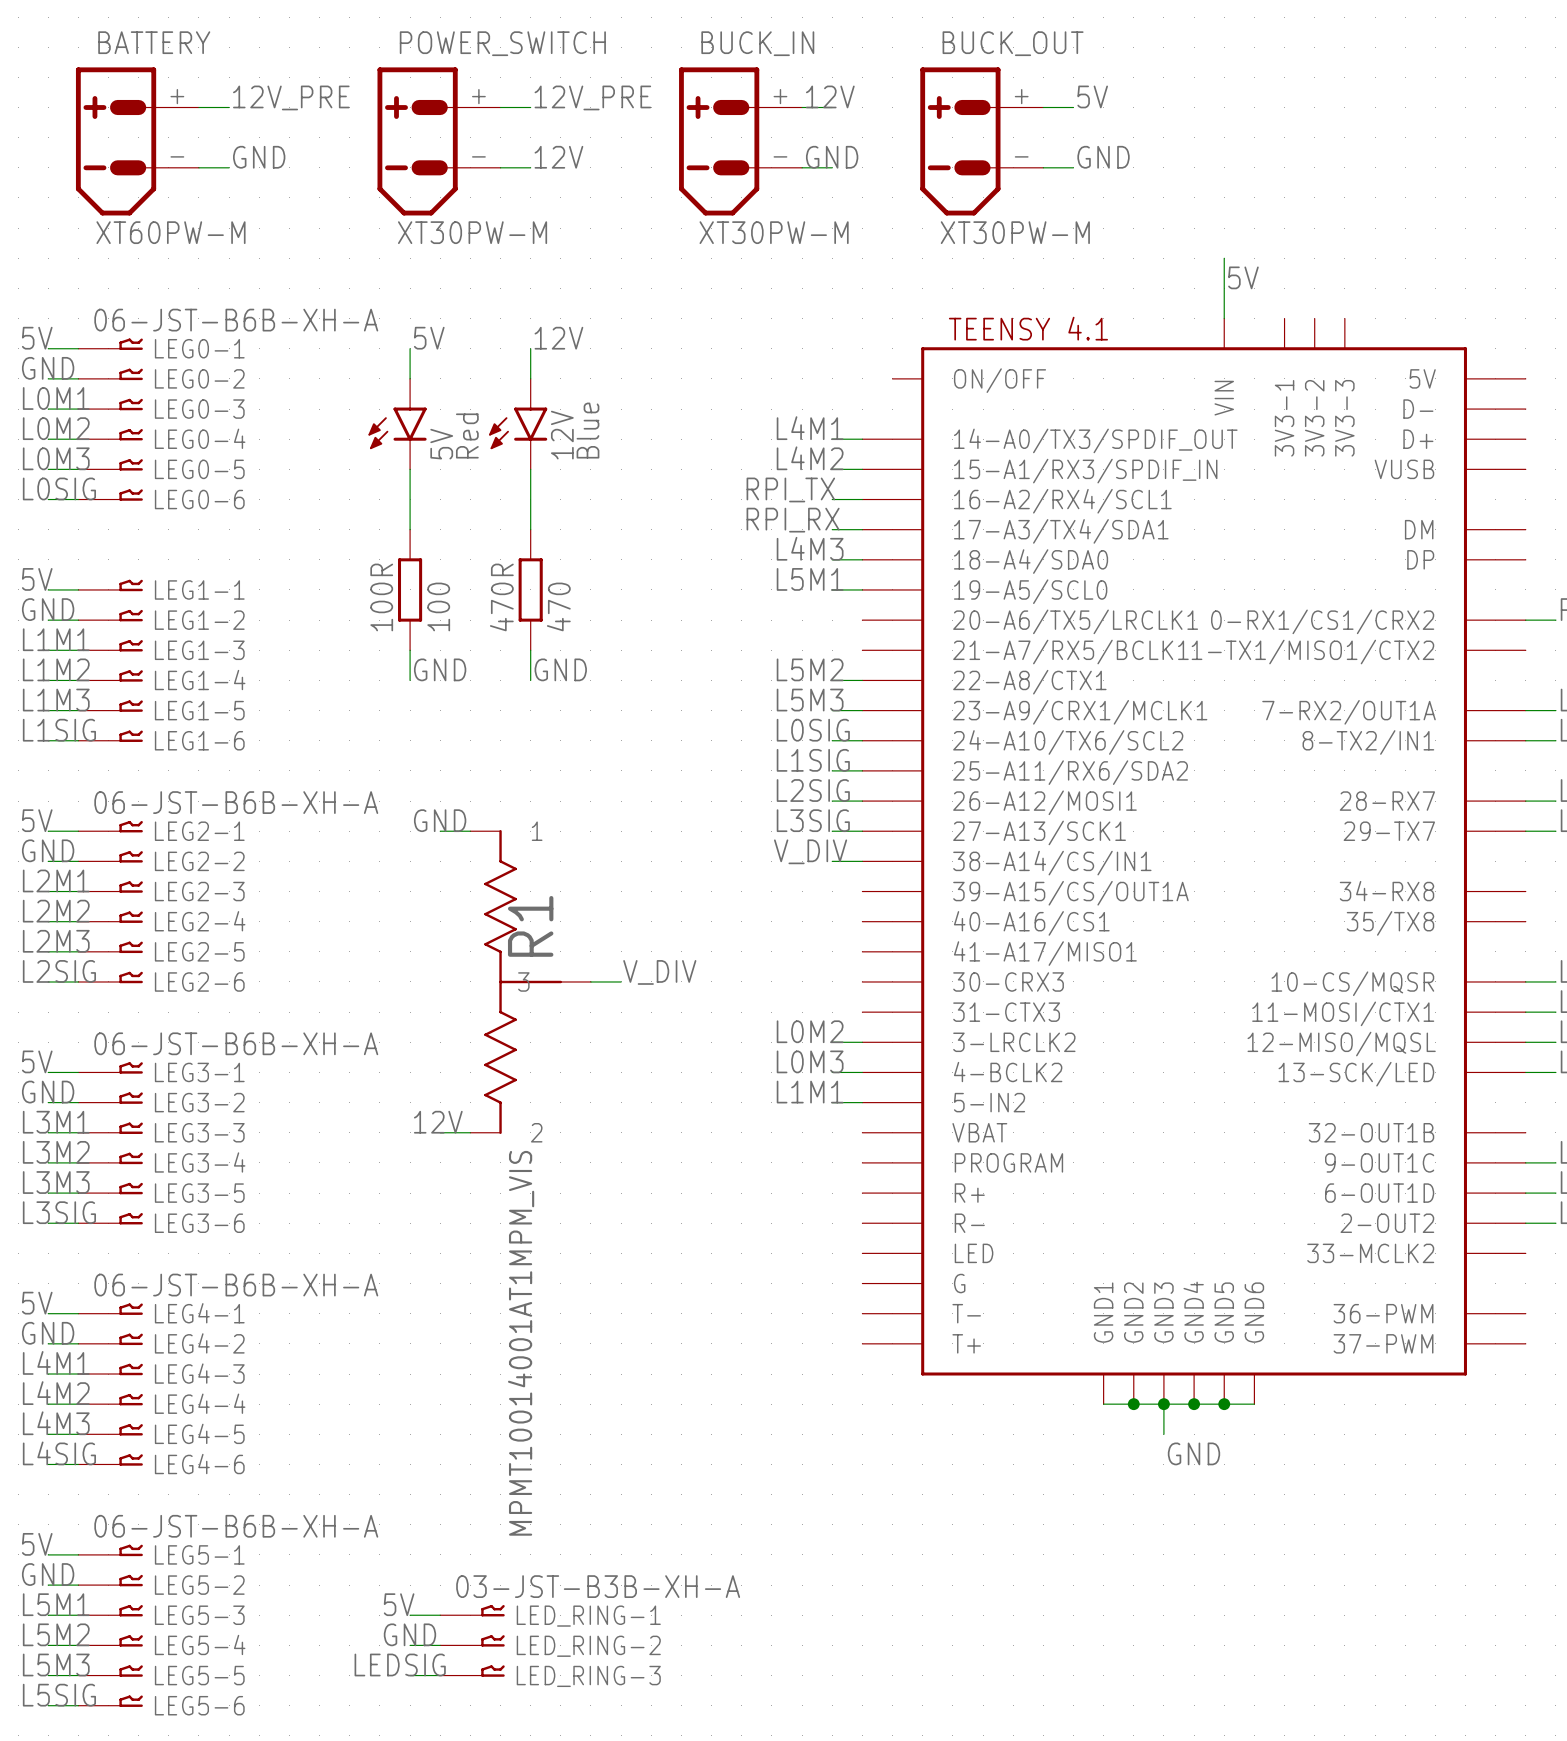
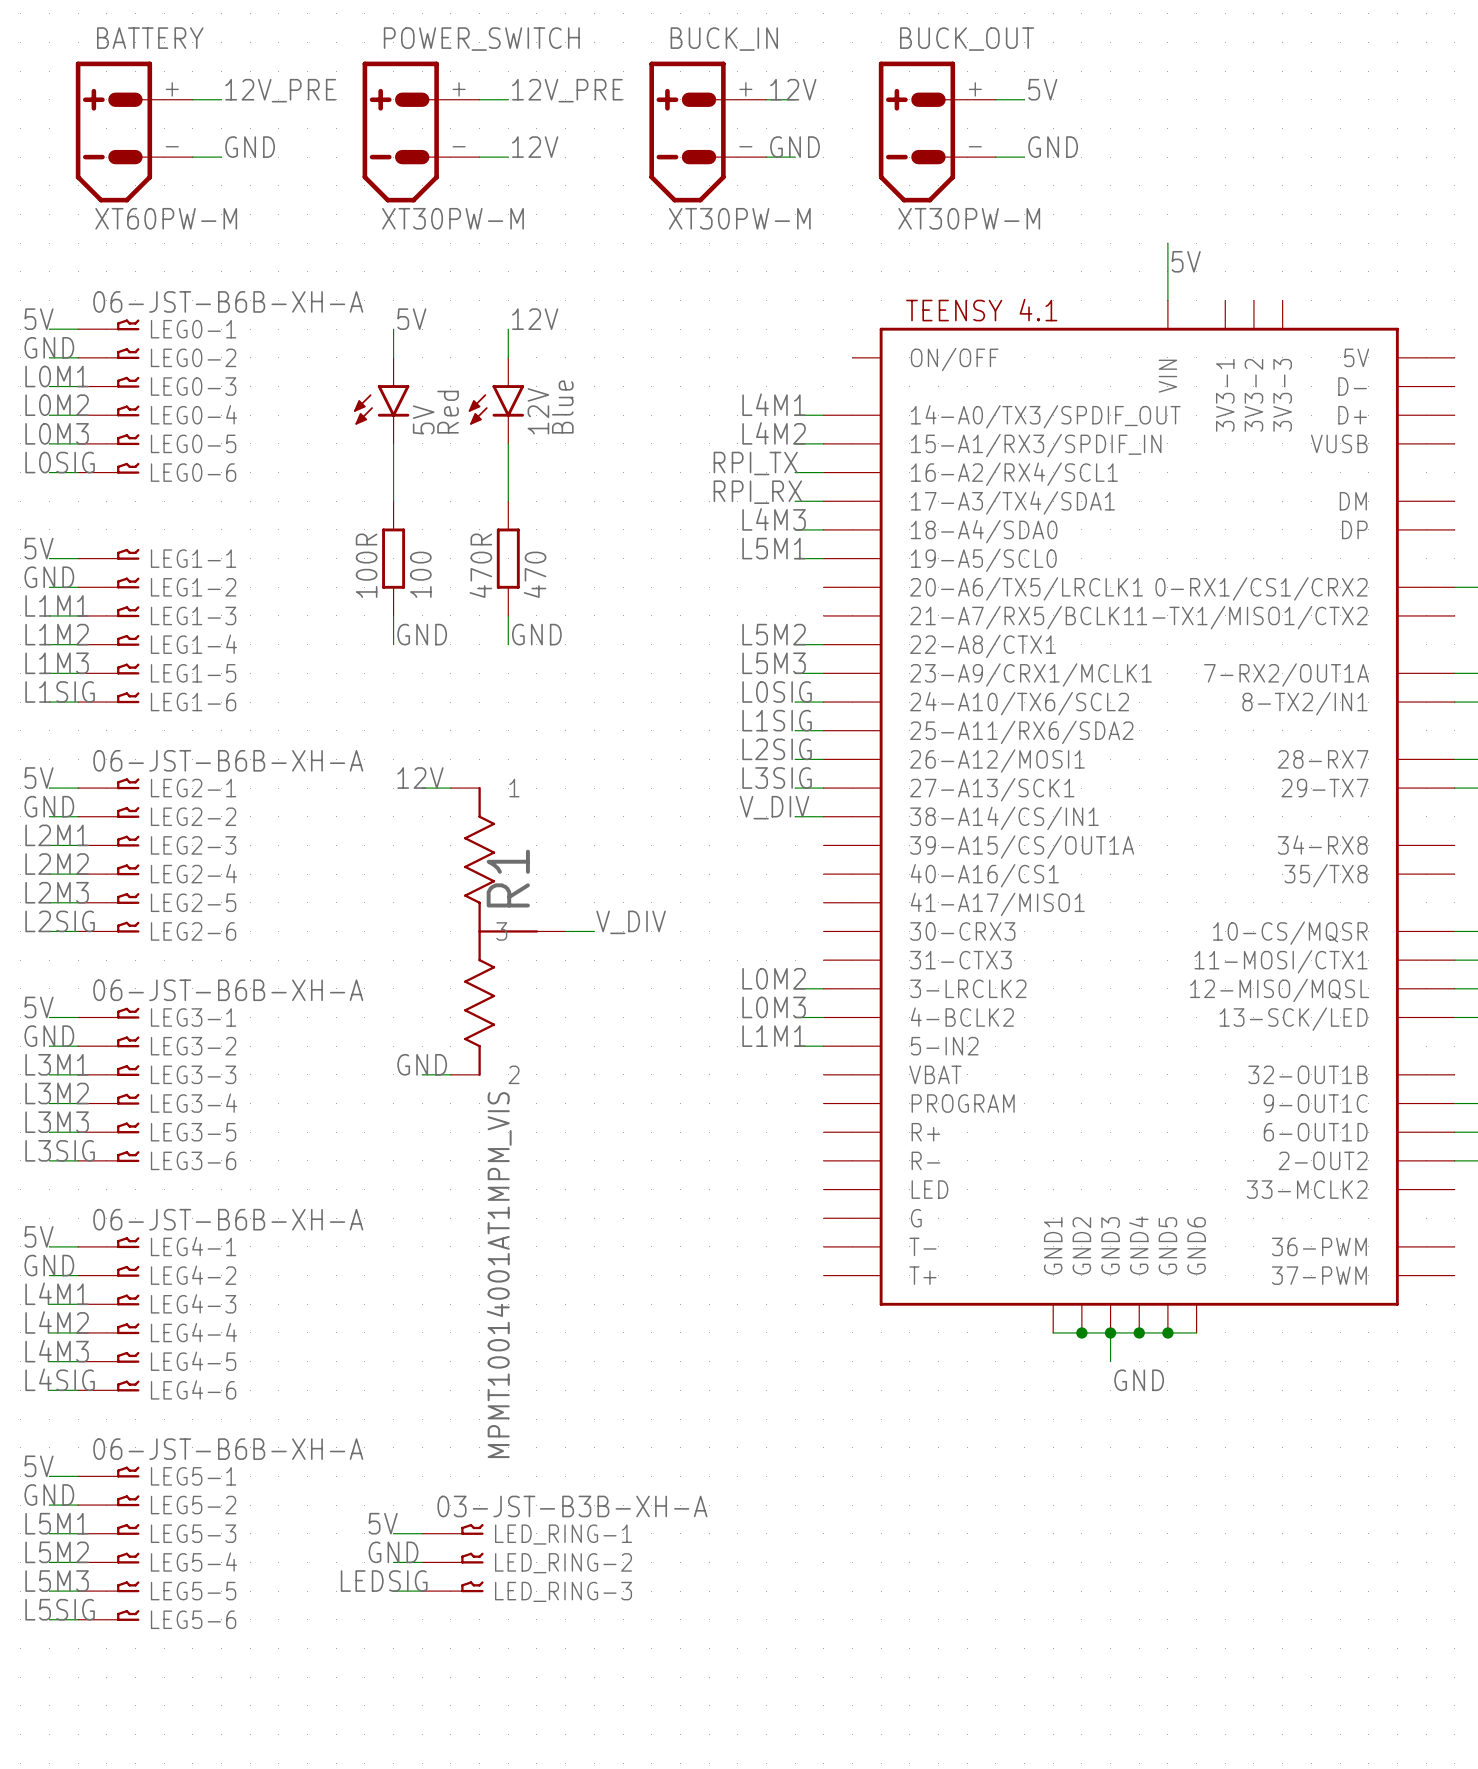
label: GND (440, 820) -> 12V (420, 778)
label: 12V (438, 1122) -> GND (422, 1064)

